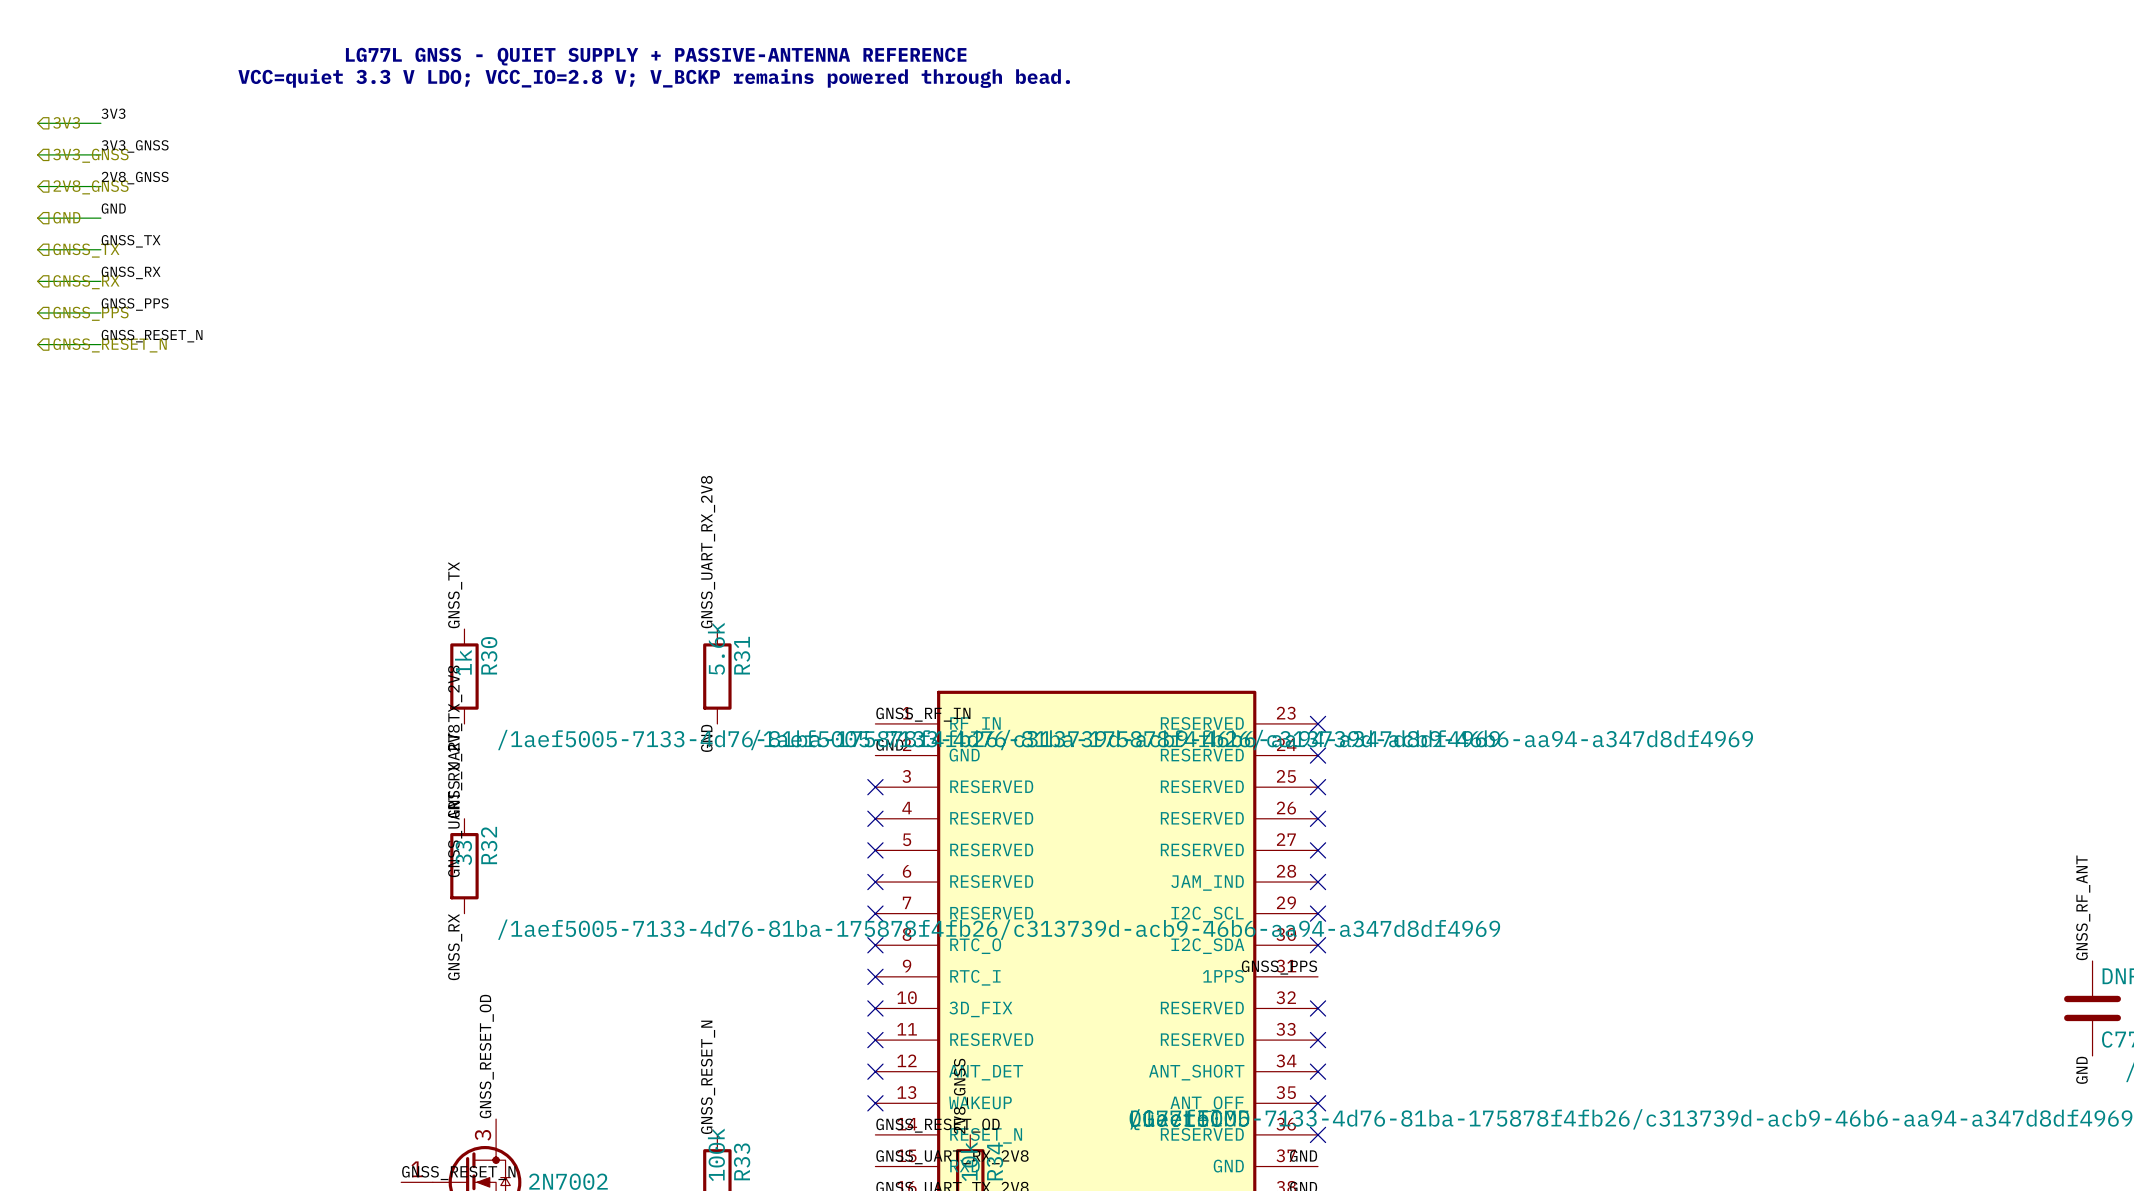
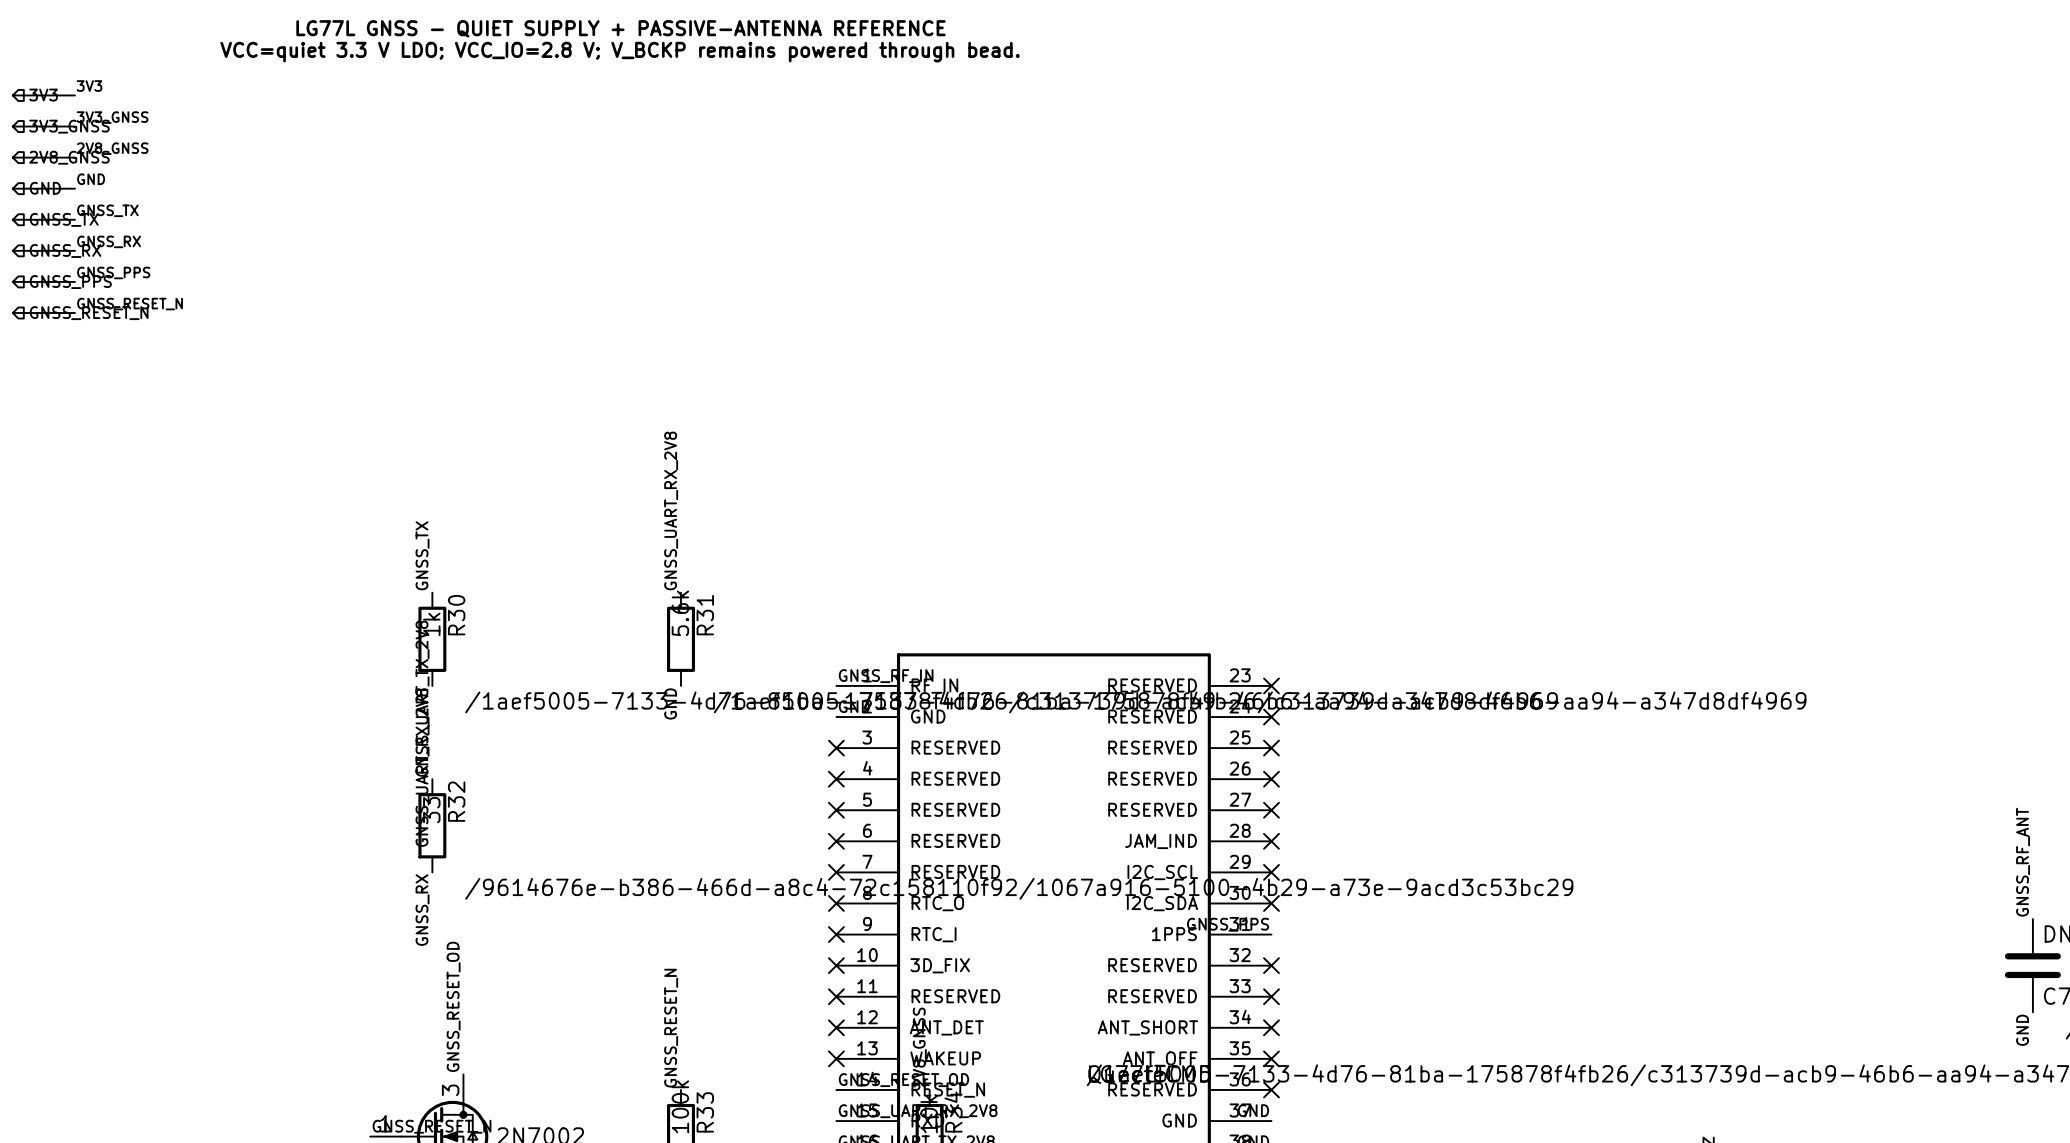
R32 text: /1aef5005-7133-4d76-81ba-175878f4fb26/c313739d-acb9-46b6-aa94-a347d8df4969 (999, 929) -> /9614676e-b386-466d-a8c4-72c158110f92/1067a916-5100-4b29-a73e-9acd3c53bc29 (1019, 888)

